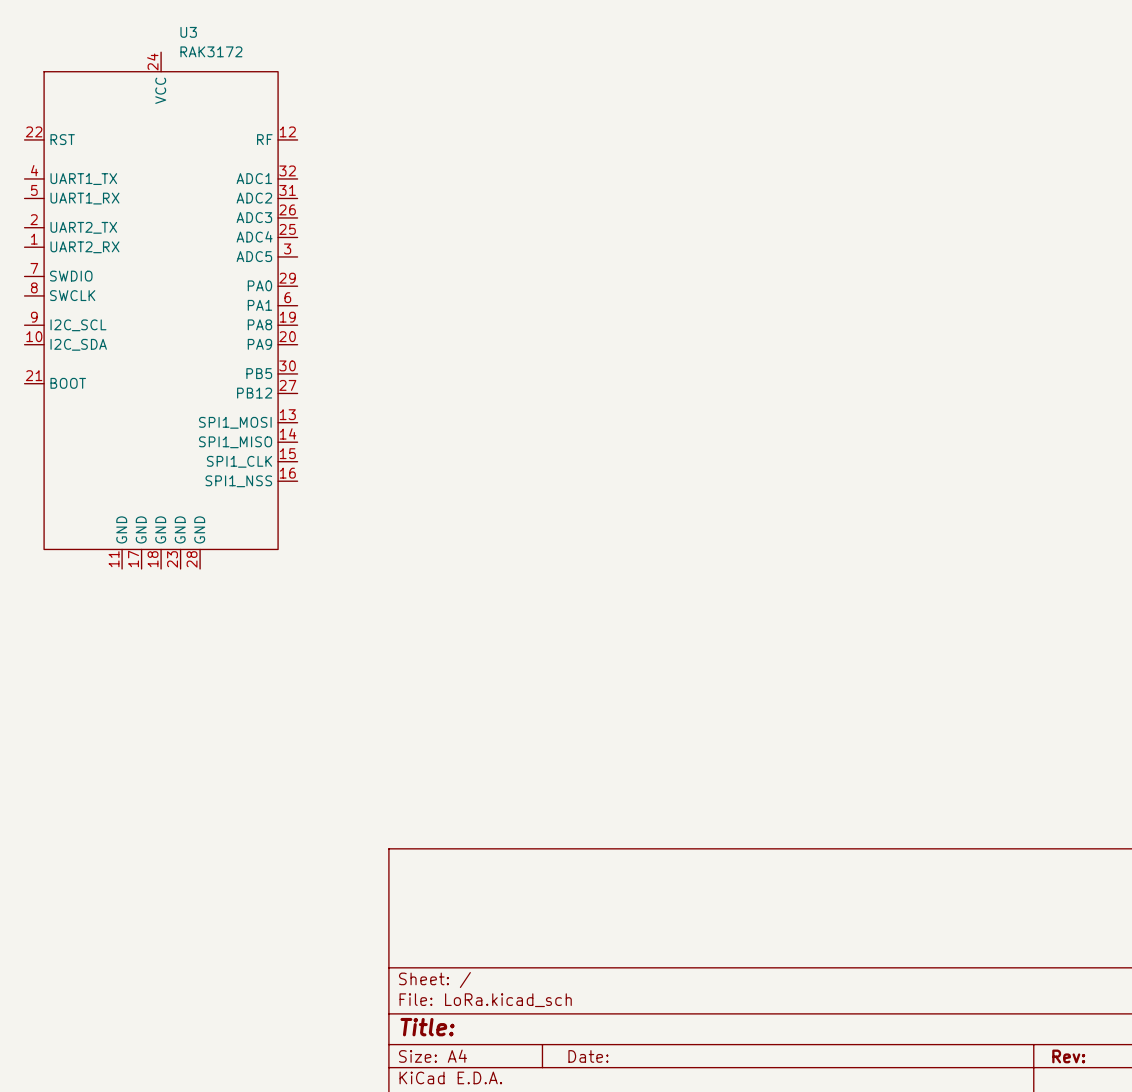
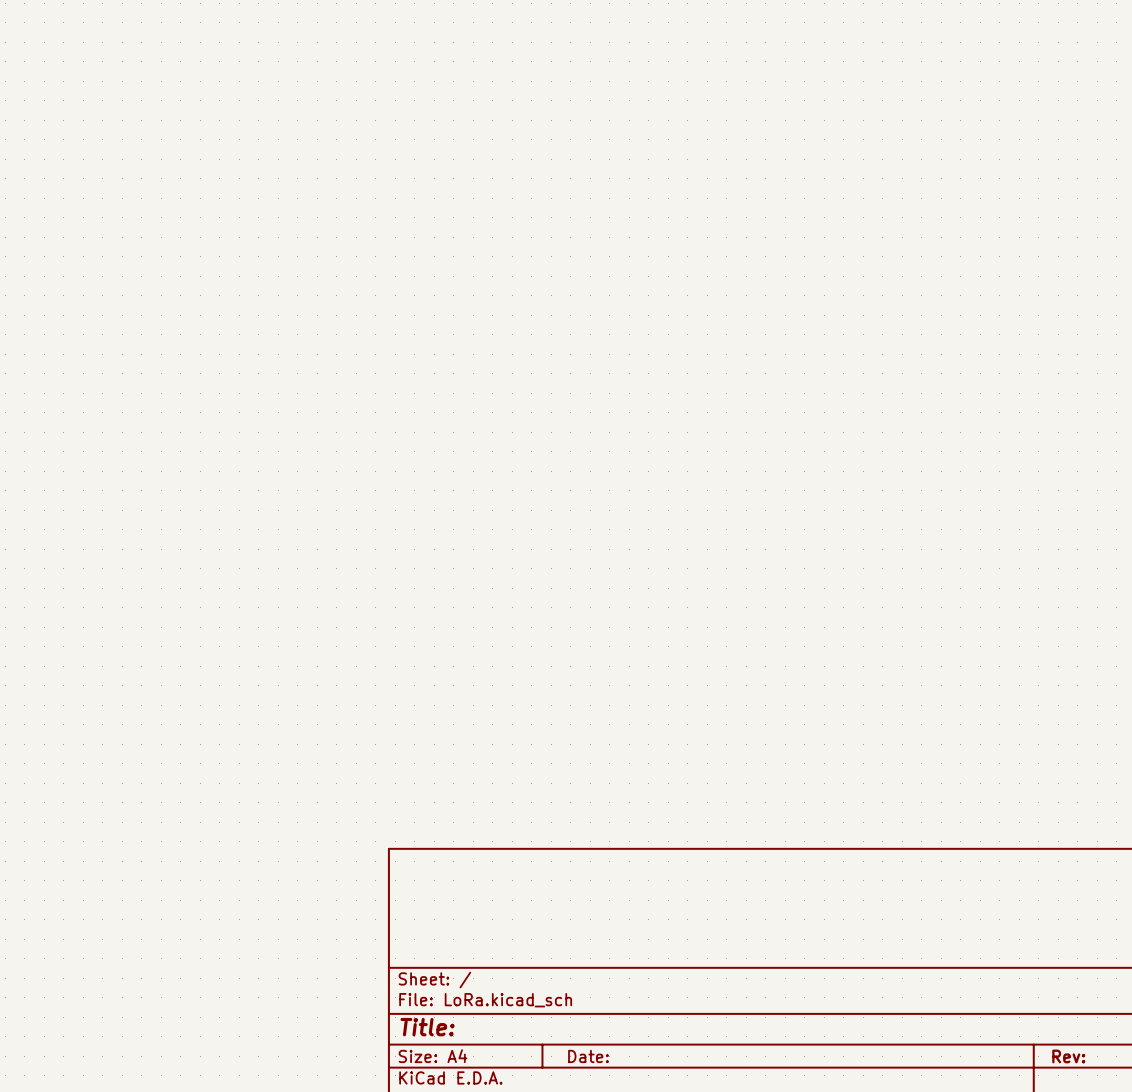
U3: RAK3172 (161, 310) -> none

